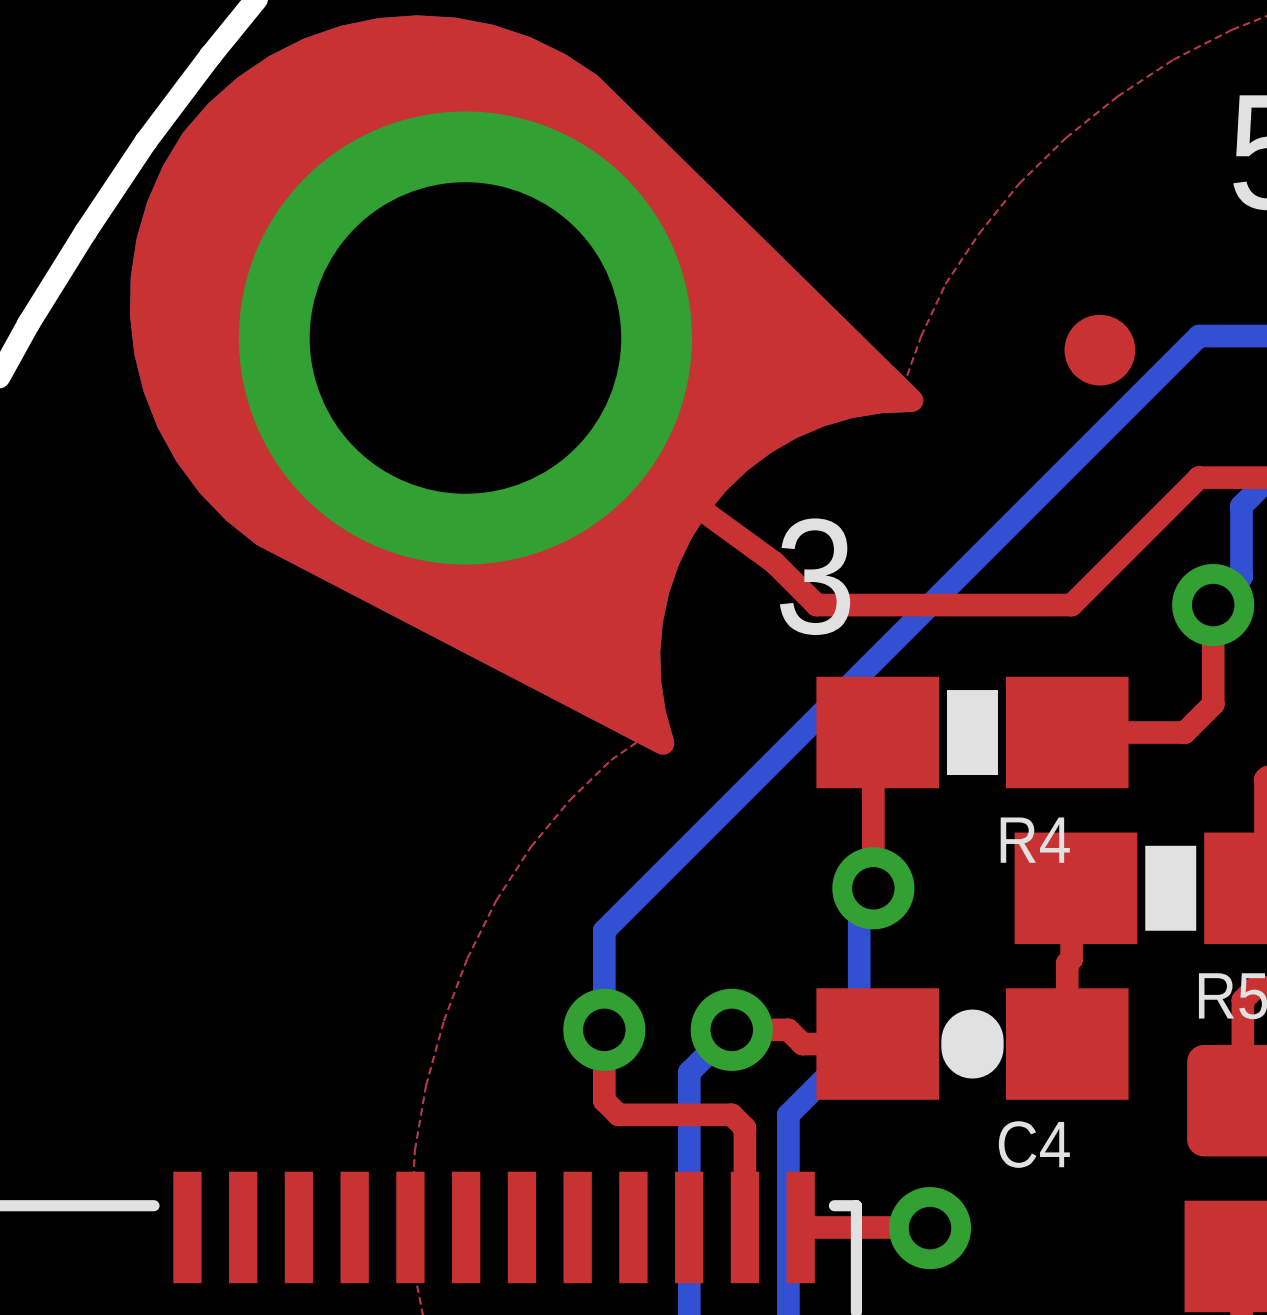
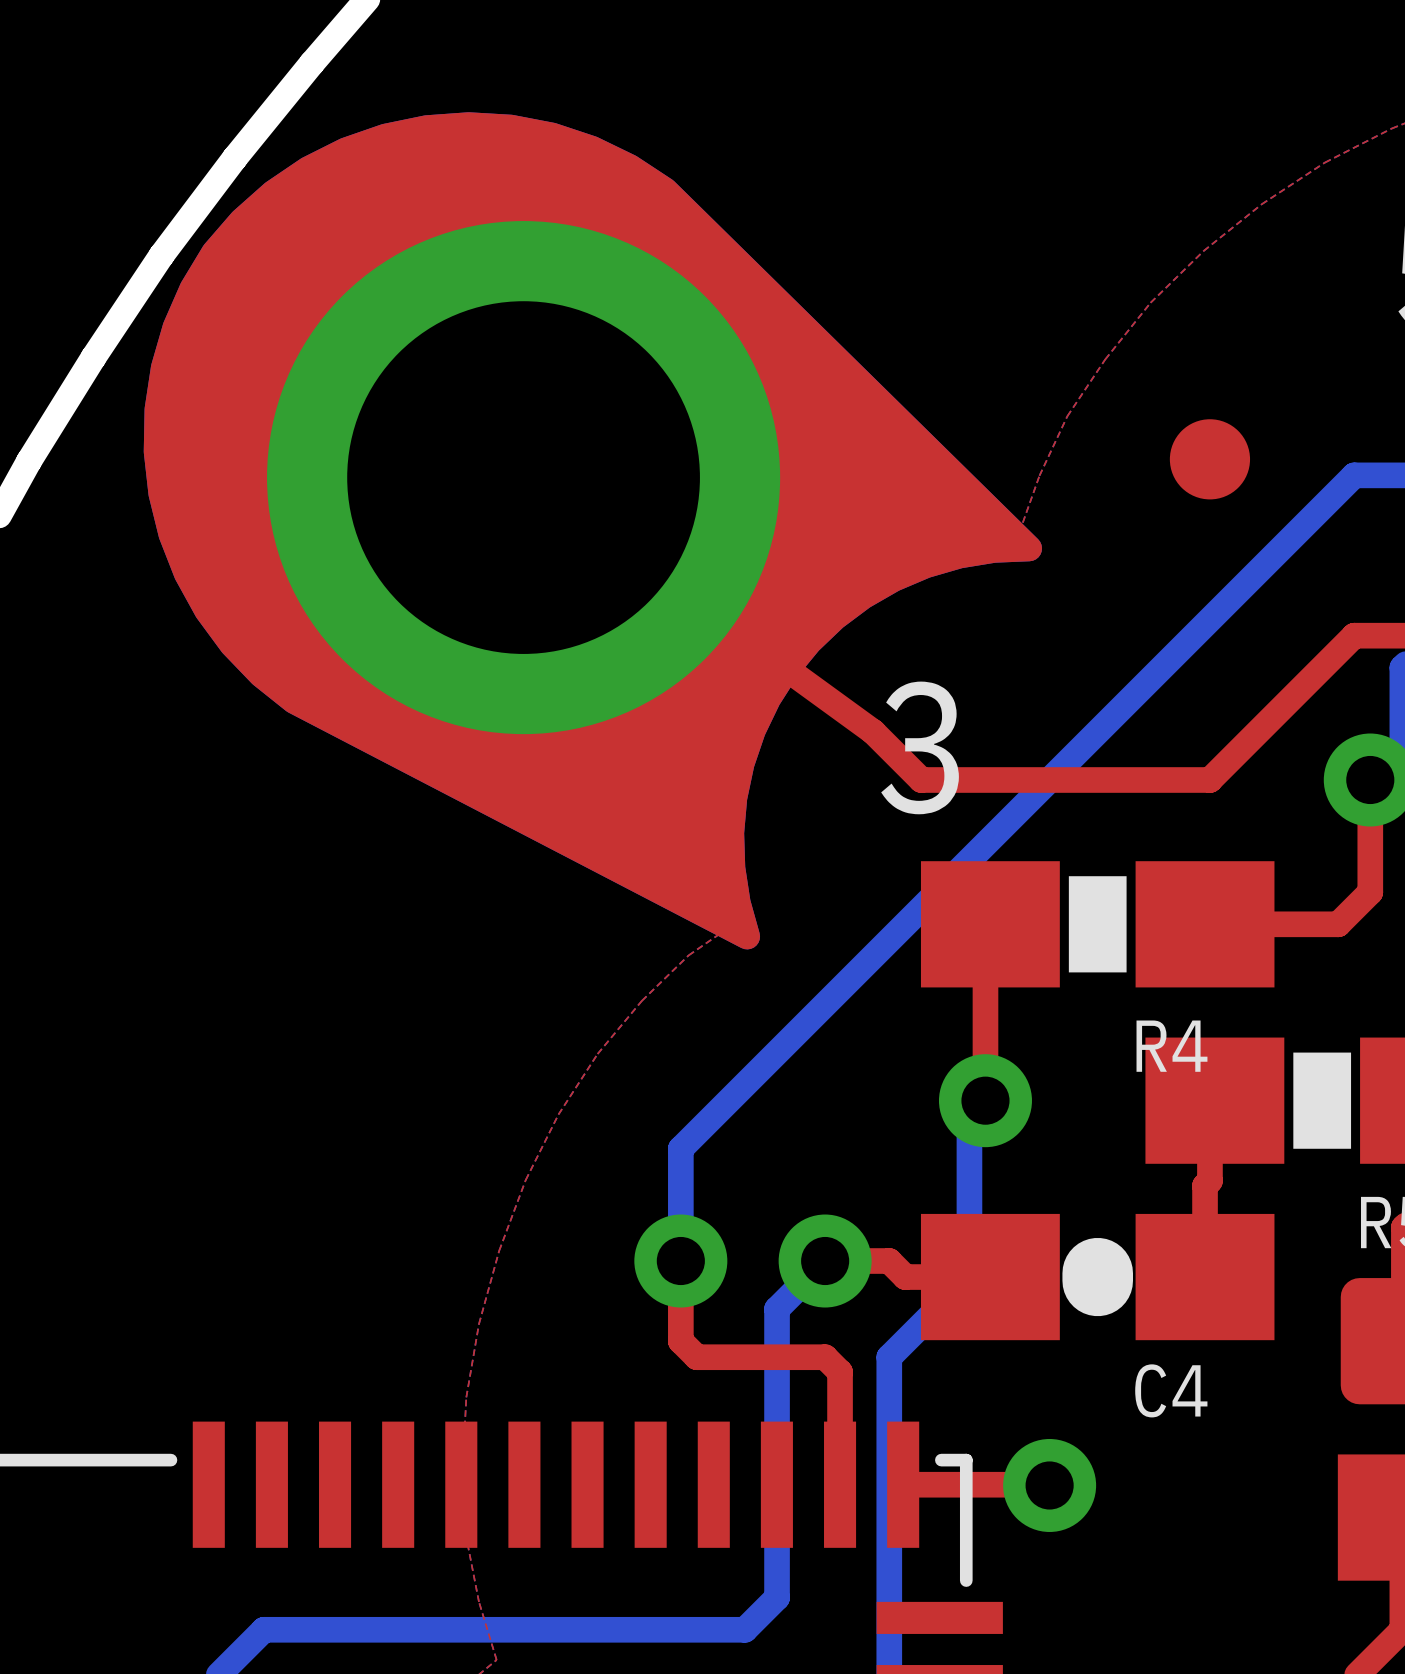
part position: (1099, 350) -> (1209, 459)

